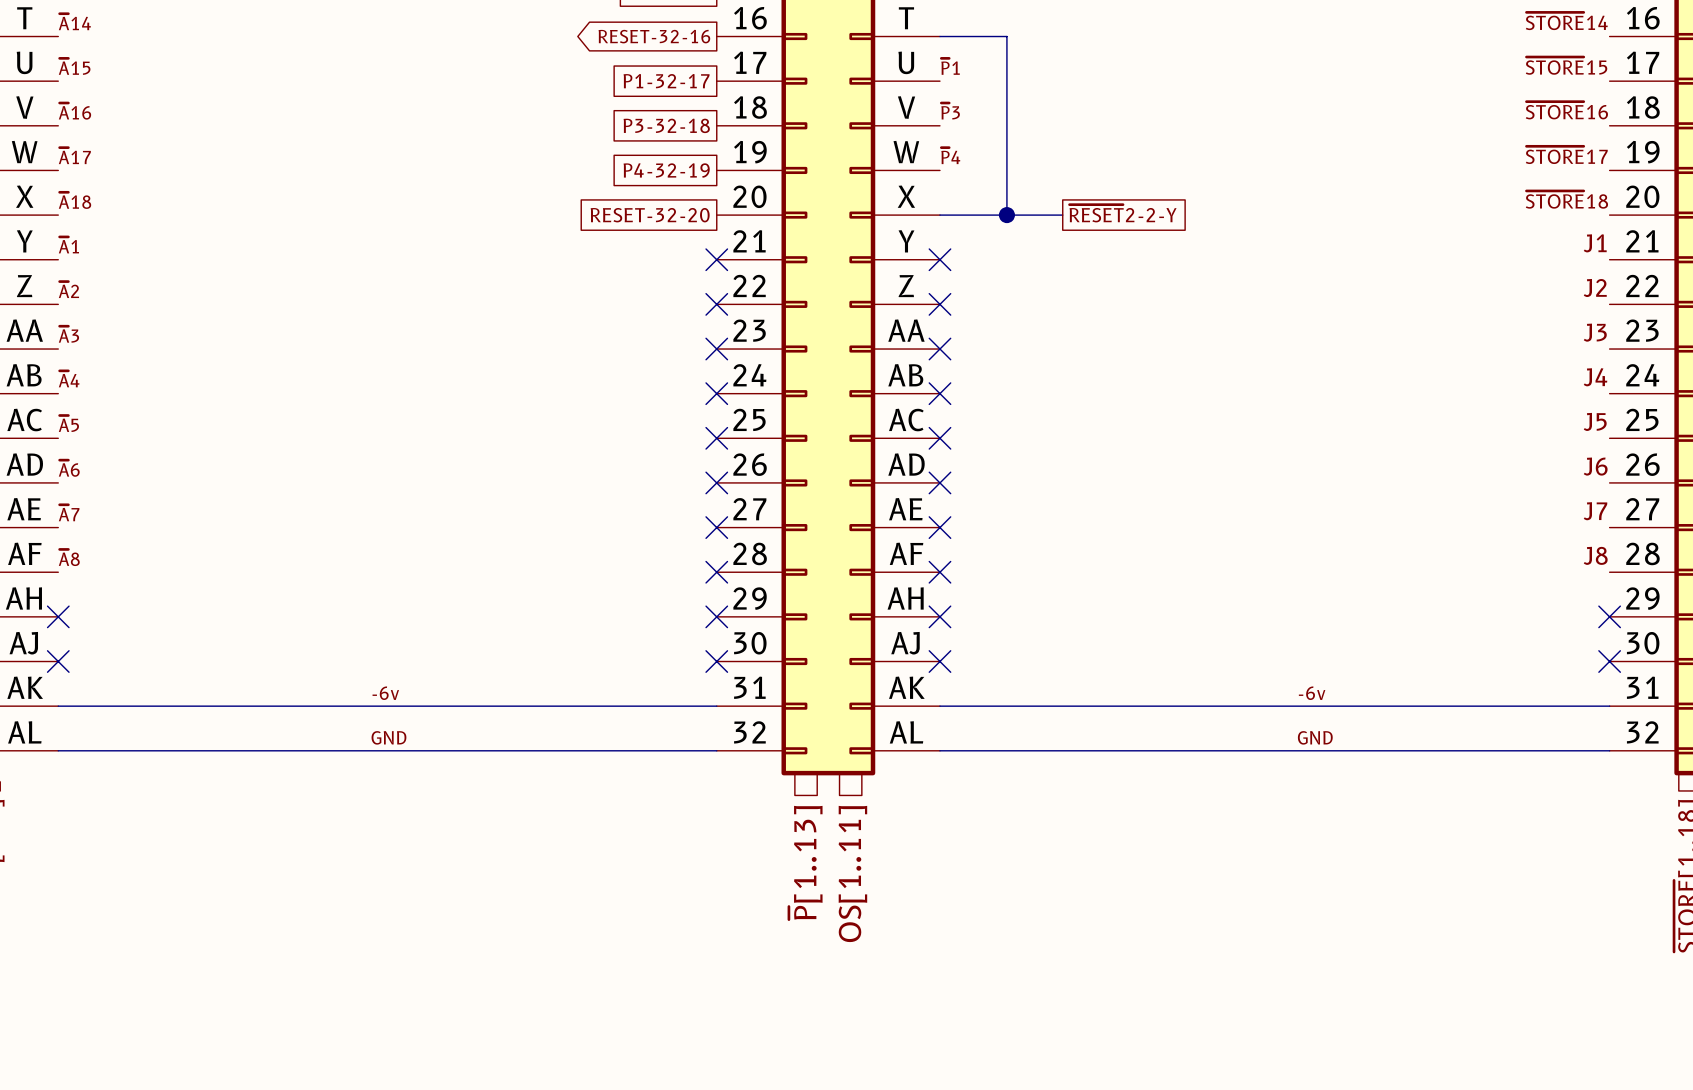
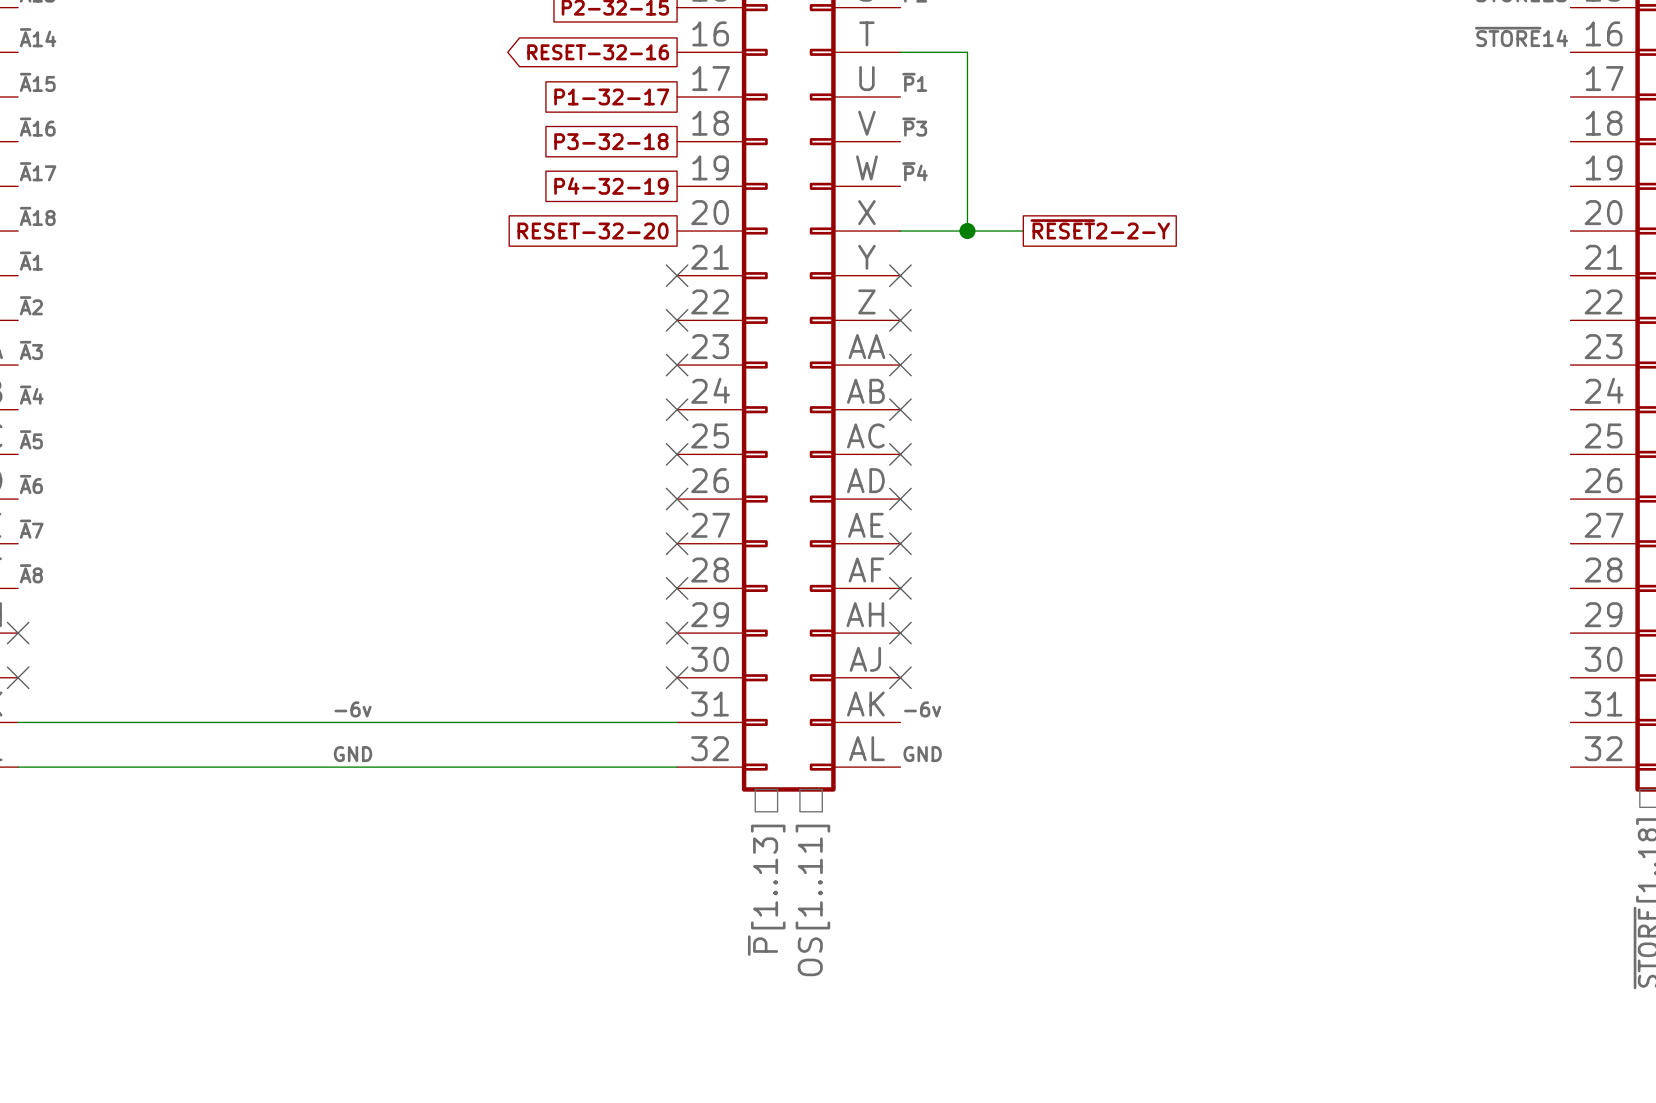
label: ~{STORE}15 (1566, 65) -> none
label: ~{STORE}16 (1566, 110) -> none
label: ~{STORE}17 (1566, 155) -> none
label: ~{STORE}18 (1566, 199) -> none
label: J1 (1595, 243) -> none
label: J2 (1595, 288) -> none
label: J3 (1595, 332) -> none
label: J4 (1595, 377) -> none
label: J5 (1595, 421) -> none
label: J6 (1595, 466) -> none
label: J7 (1595, 511) -> none
label: J8 (1595, 555) -> none
no-connect mark: (1609, 616) -> none
no-connect mark: (1609, 661) -> none
label position: -6v (1312, 693) -> -6v (922, 709)
wire: (939, 706) (1609, 706) -> none
label position: GND (1315, 737) -> GND (922, 754)
wire: (939, 750) (1609, 750) -> none

